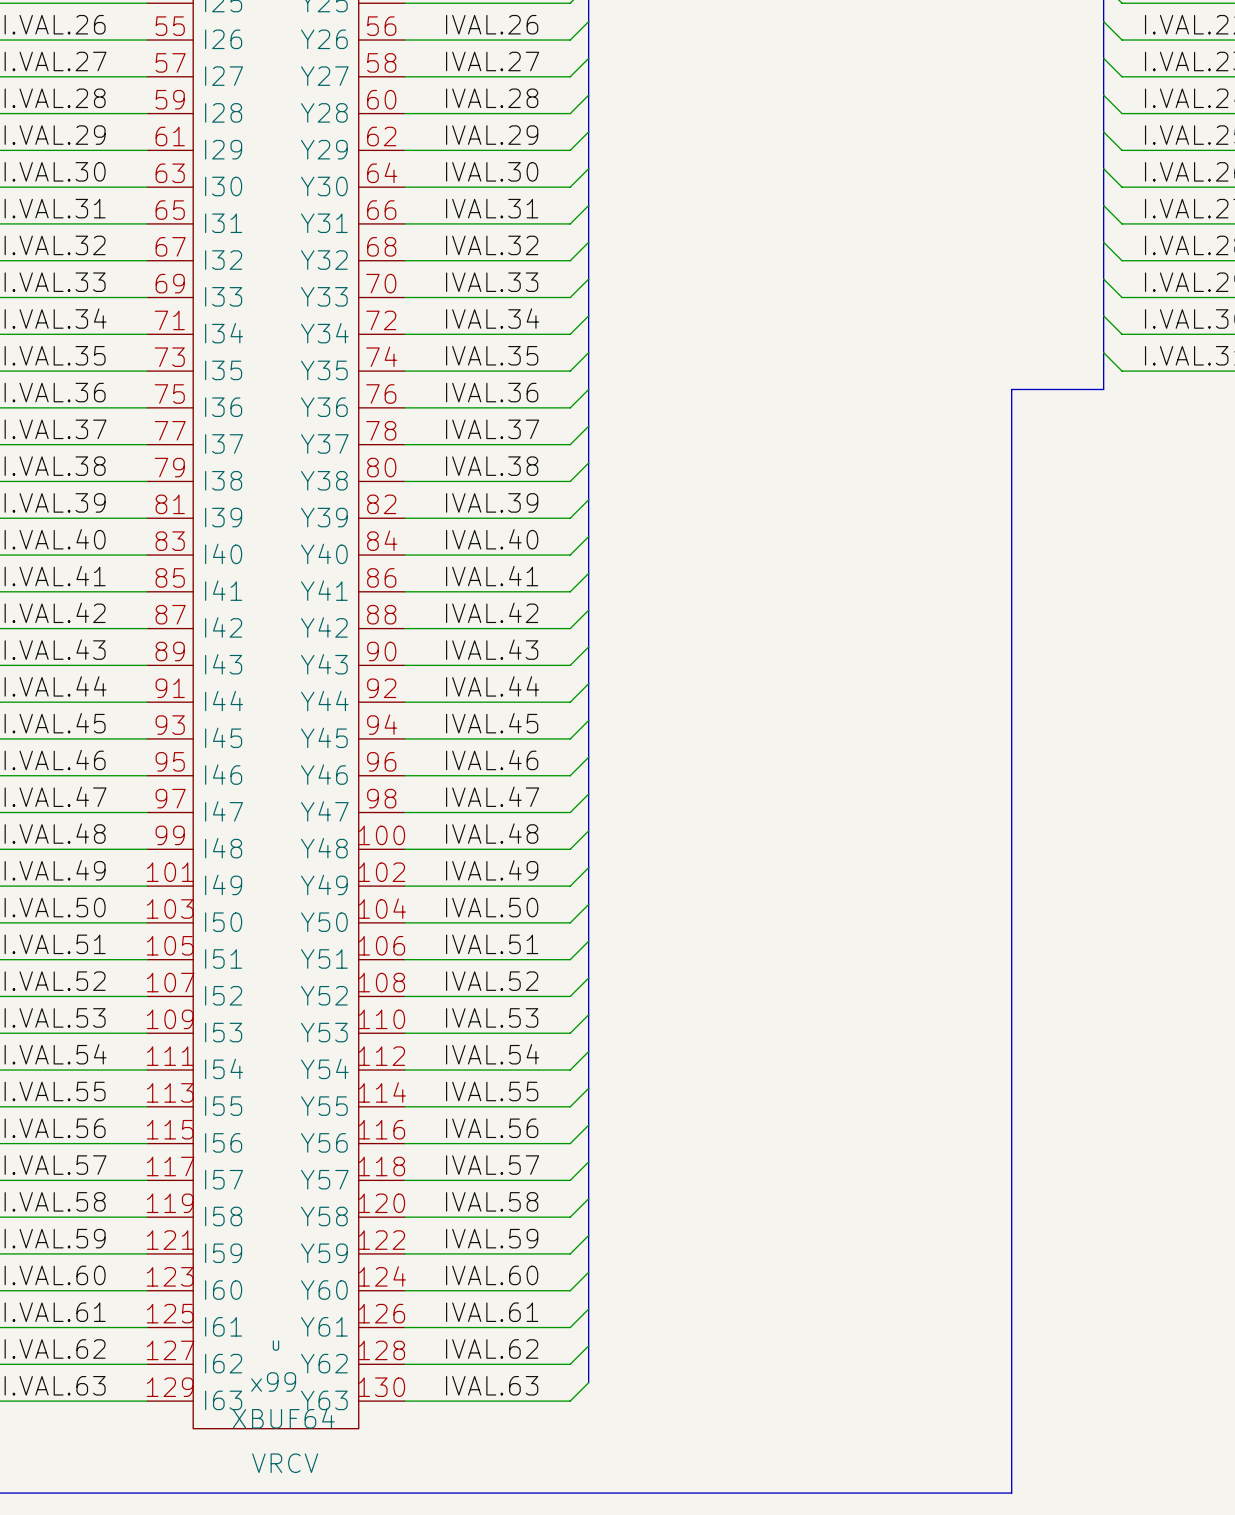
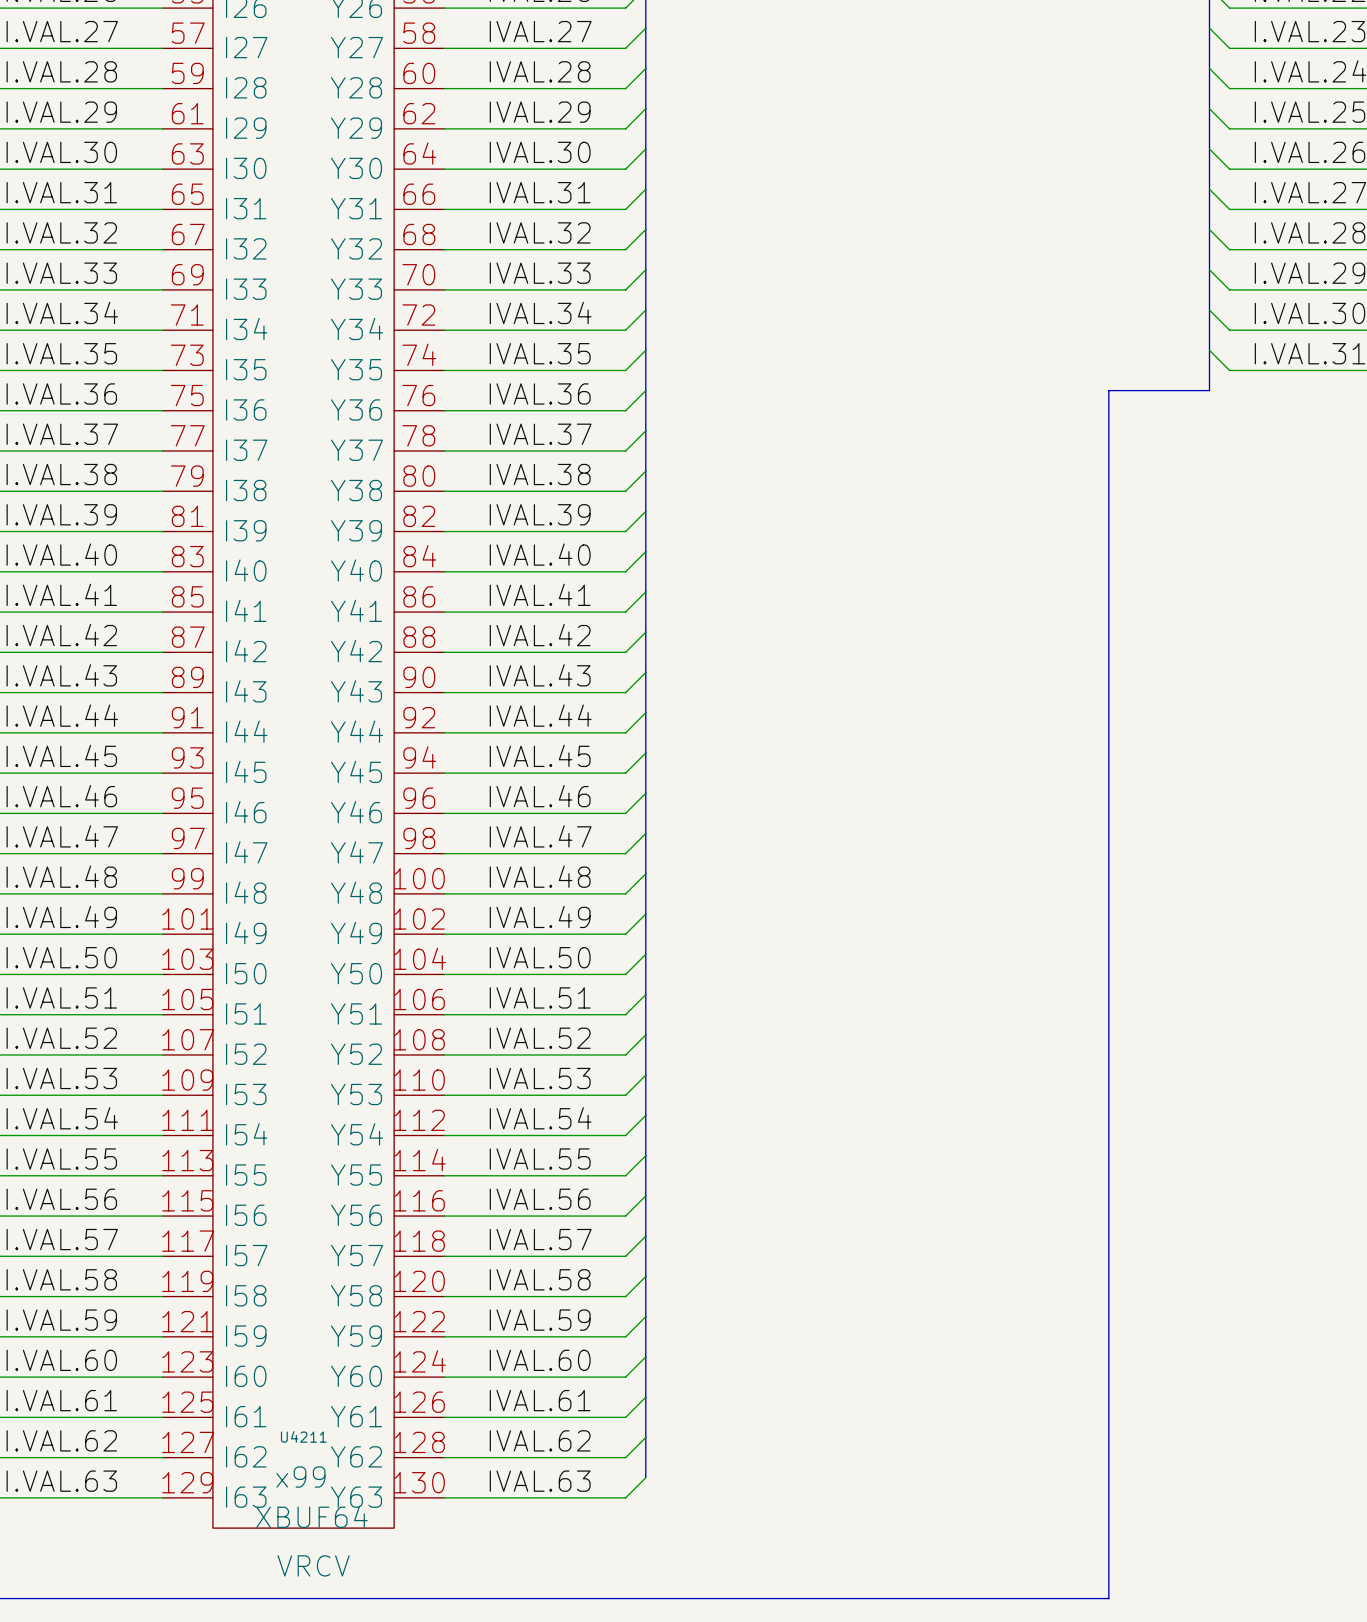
U name: U (275, 1345) -> U4211 (303, 1436)

